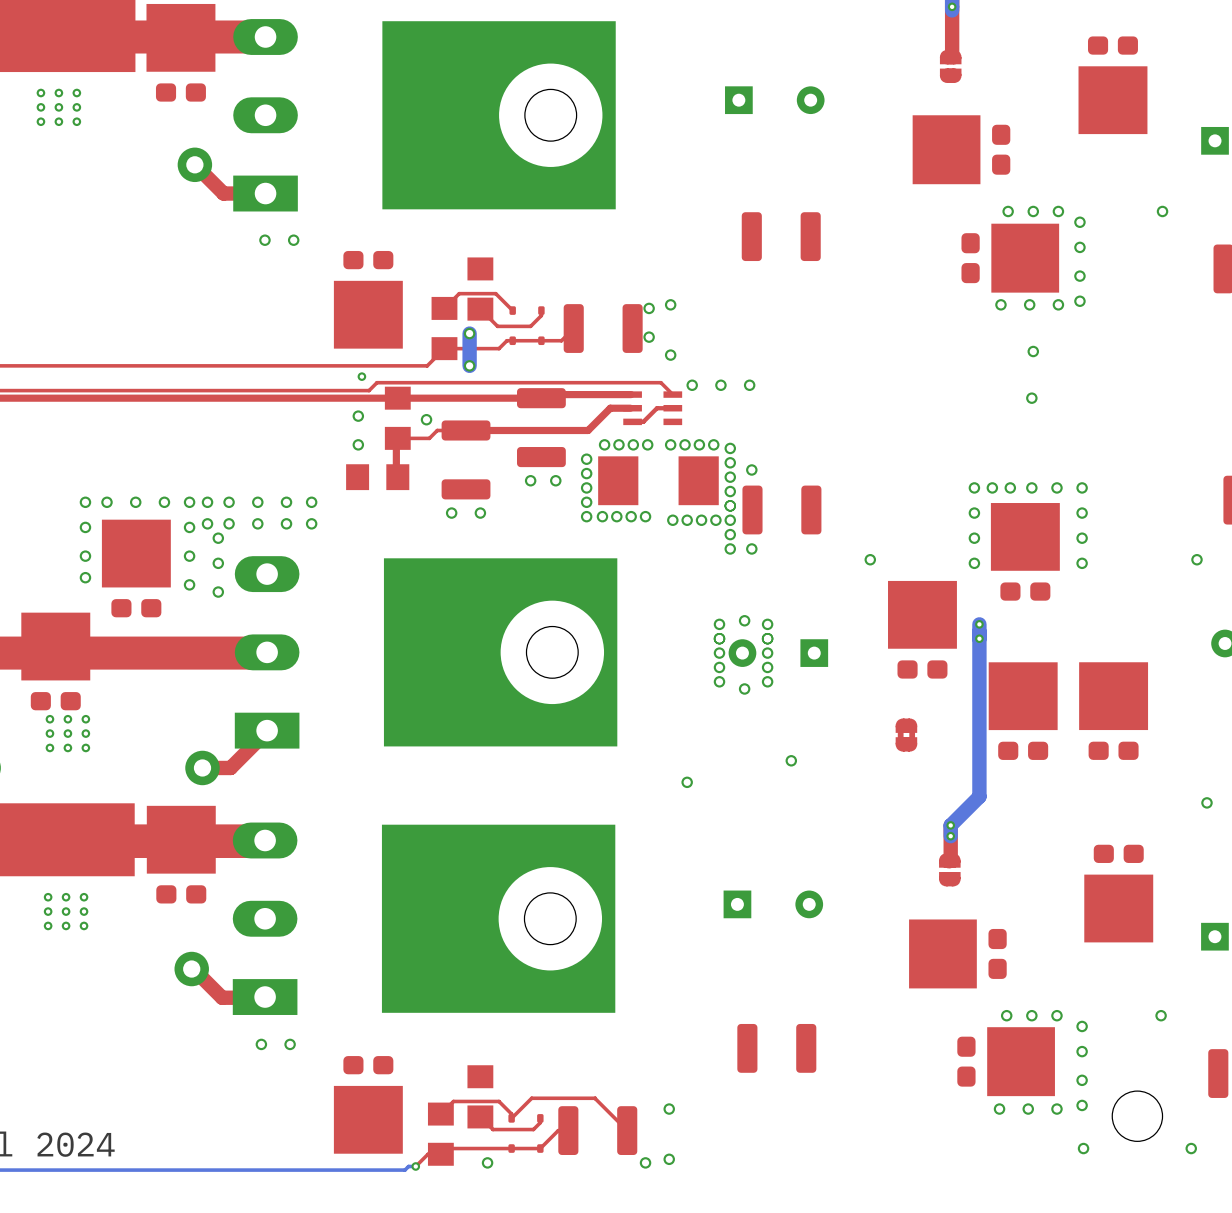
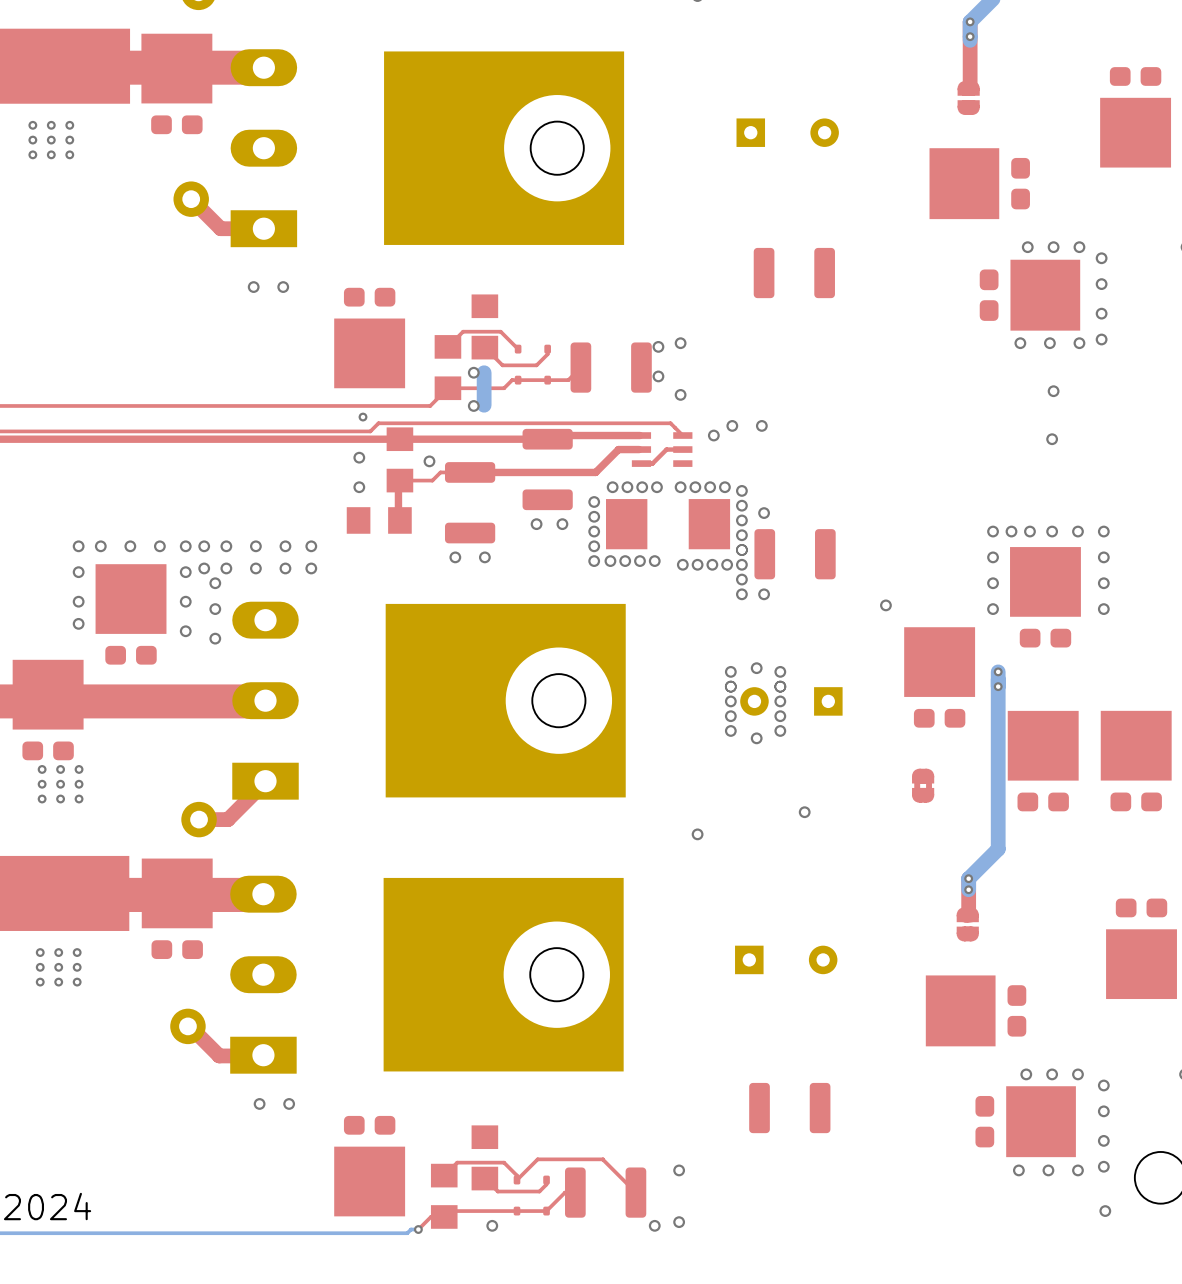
via position: (264, 240) -> (253, 287)
via position: (293, 240) -> (283, 287)
bottom track: (469, 333) (469, 365) -> none
bottom track: none -> (484, 372) (484, 405)
via position: (692, 385) -> (713, 435)

